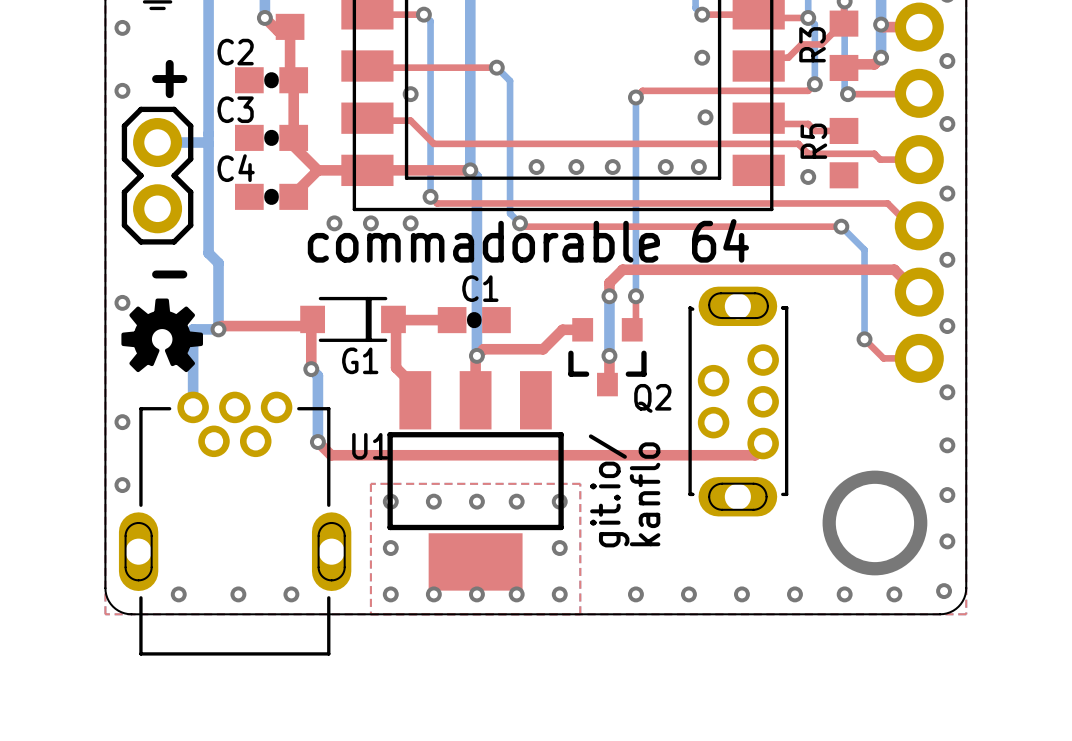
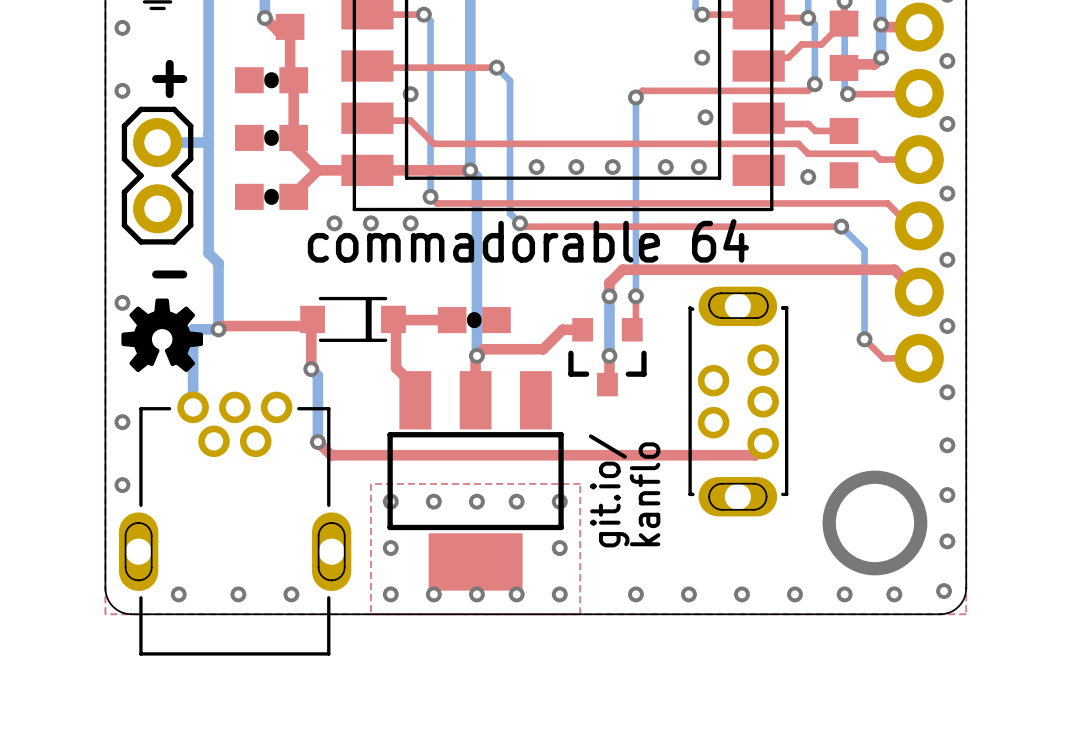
R3 name: R3 (812, 44) -> none
C2 name: C2 (235, 52) -> none
C3 name: C3 (235, 109) -> none
R5 name: R5 (813, 141) -> none
C4 name: C4 (236, 168) -> none
C1 name: C1 (480, 288) -> none
G1 name: G1 (360, 360) -> none
Q2 name: Q2 (652, 398) -> none
U1 name: U1 (370, 446) -> none

